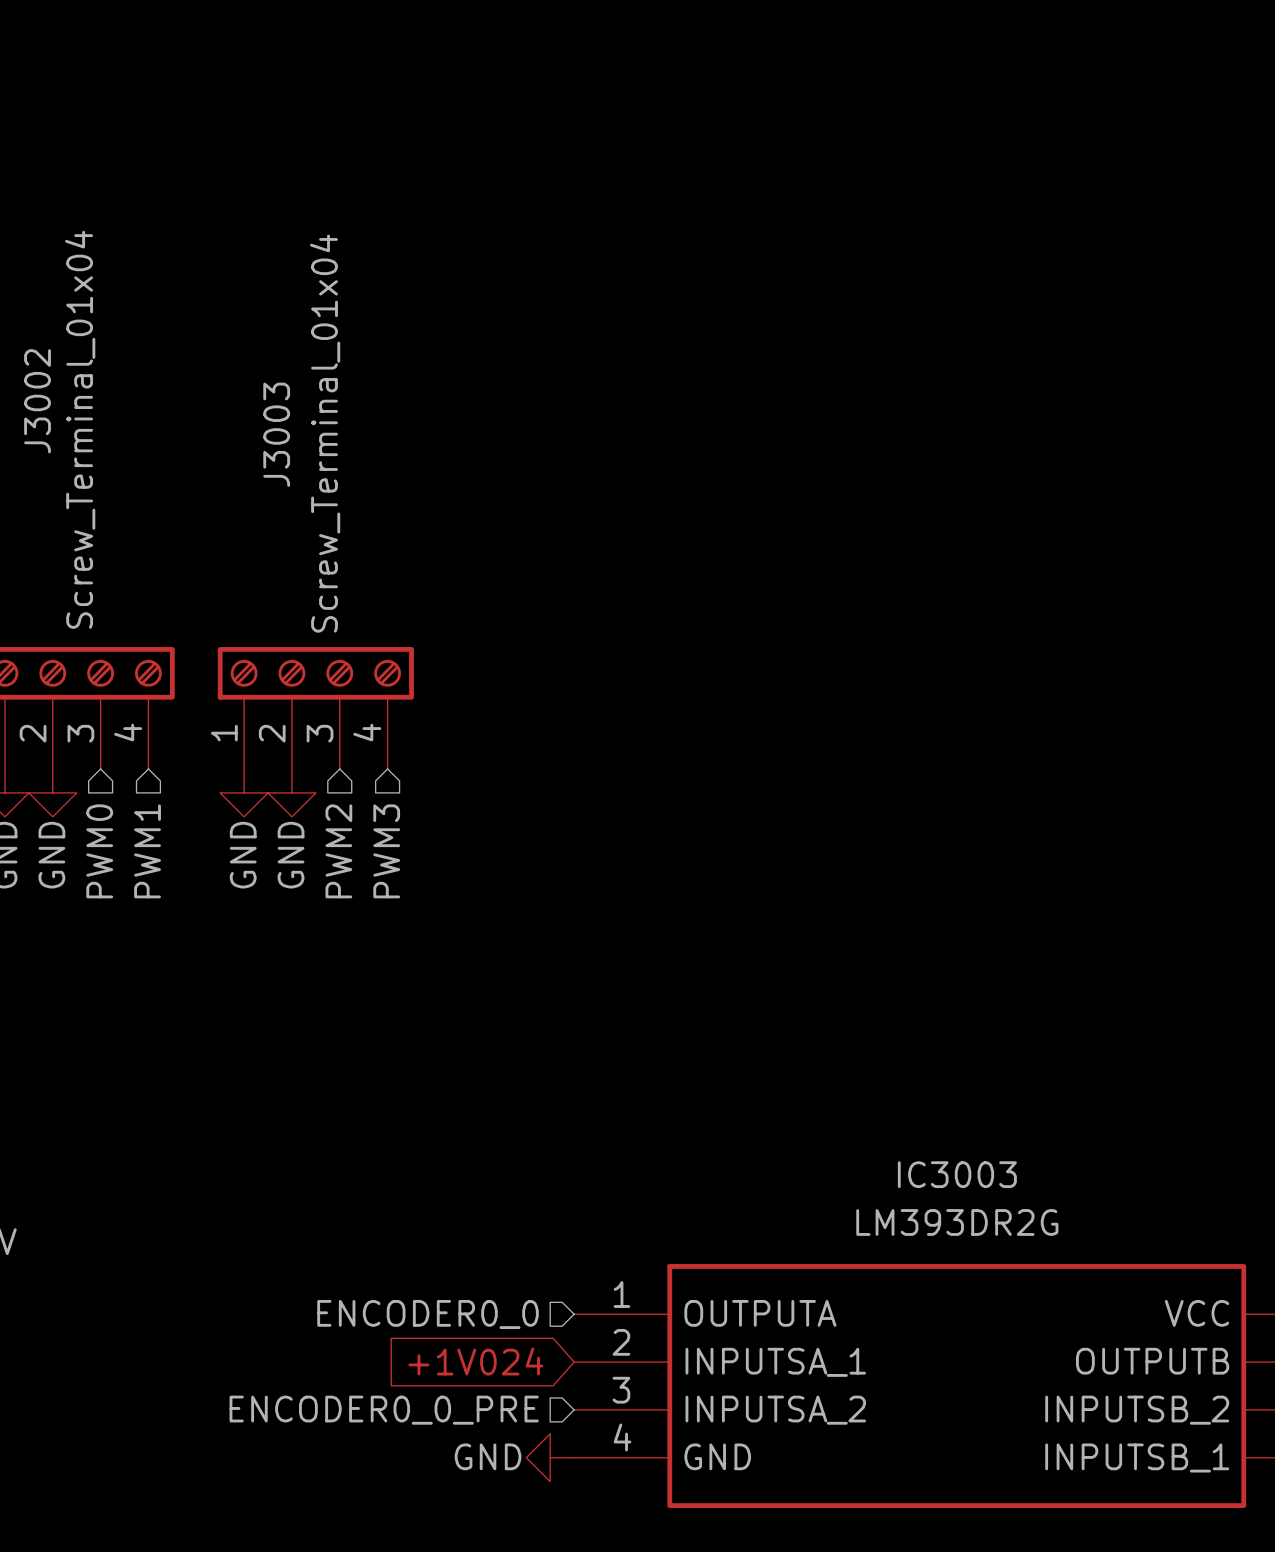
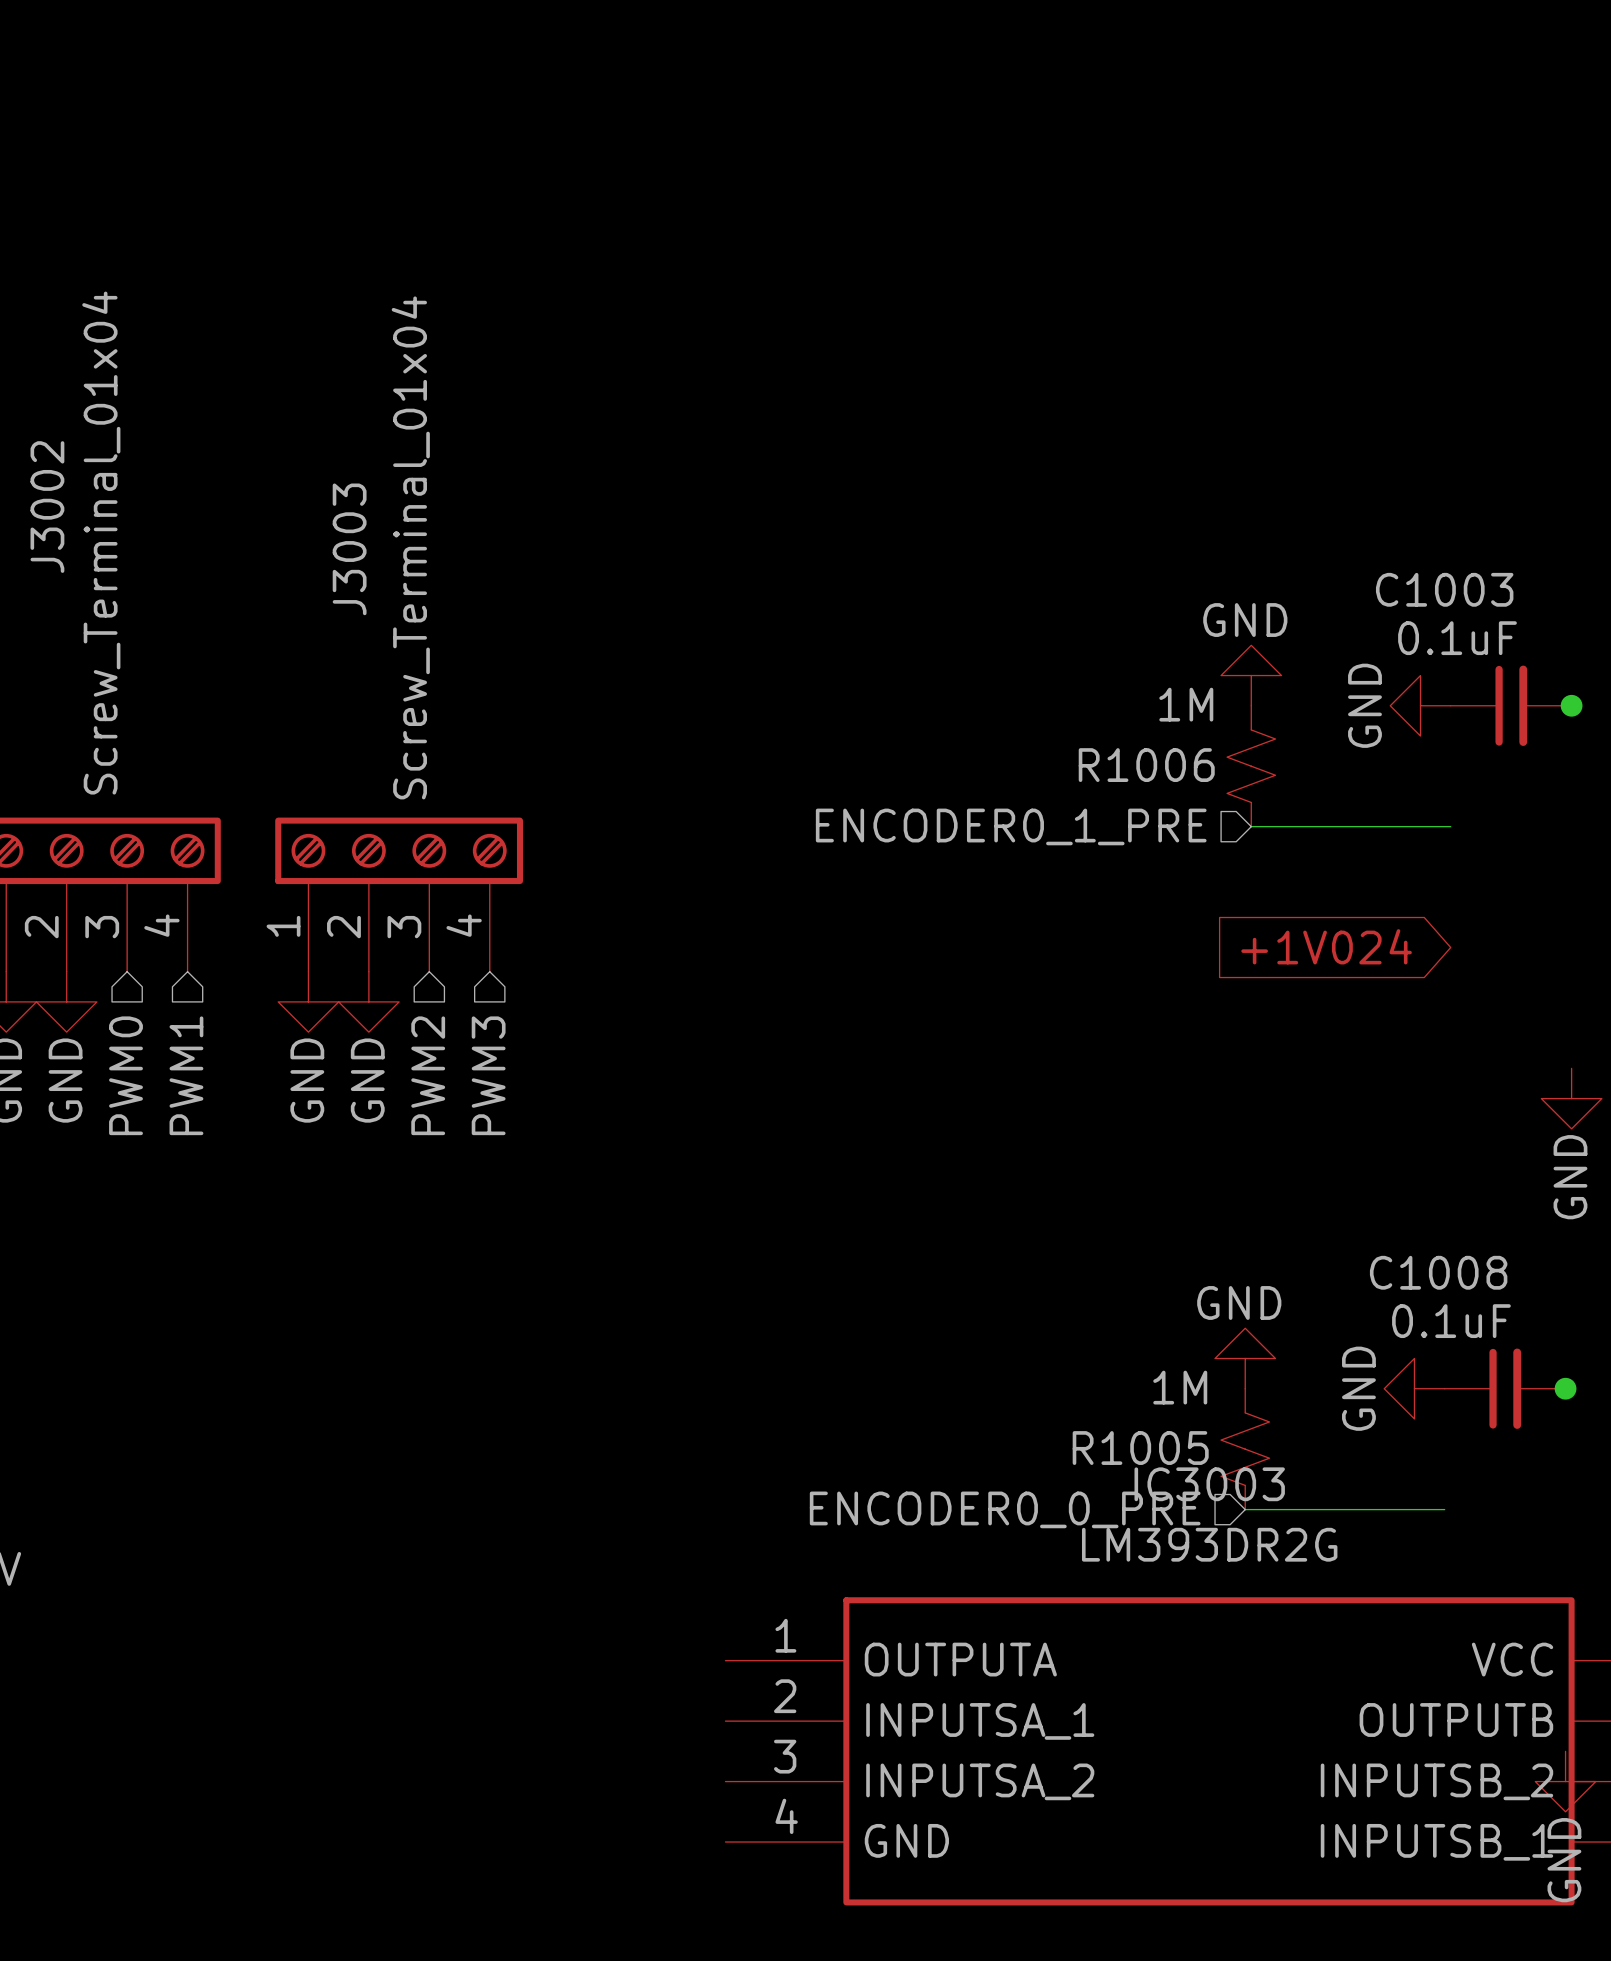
power symbol: none -> GND (1251, 675)
power symbol: none -> GND (1420, 705)
C1003: none -> 0.1uF (1511, 705)
junction: none -> (1571, 705)
R1006: none -> 1M (1251, 766)
hierarchical label: none -> ENCODER0_1_PRE (1011, 826)
wire: none -> (1251, 826) (1450, 826)
global label: none -> +1V024 (1326, 946)
power symbol: none -> GND (1571, 1098)
power symbol: none -> GND (1245, 1358)
power symbol: none -> GND (1414, 1388)
C1008: none -> 0.1uF (1505, 1388)
junction: none -> (1565, 1388)
R1005: none -> 1M (1245, 1449)
wire: none -> (1245, 1509) (1444, 1509)
hierarchical label: ENCODER0_0 (427, 1314) -> none
global label: +1V024 (475, 1361) -> none
power symbol: none -> GND (1565, 1781)
hierarchical label position: ENCODER0_0_PRE (384, 1410) -> ENCODER0_0_PRE (1005, 1509)
power symbol: GND (550, 1457) -> none

